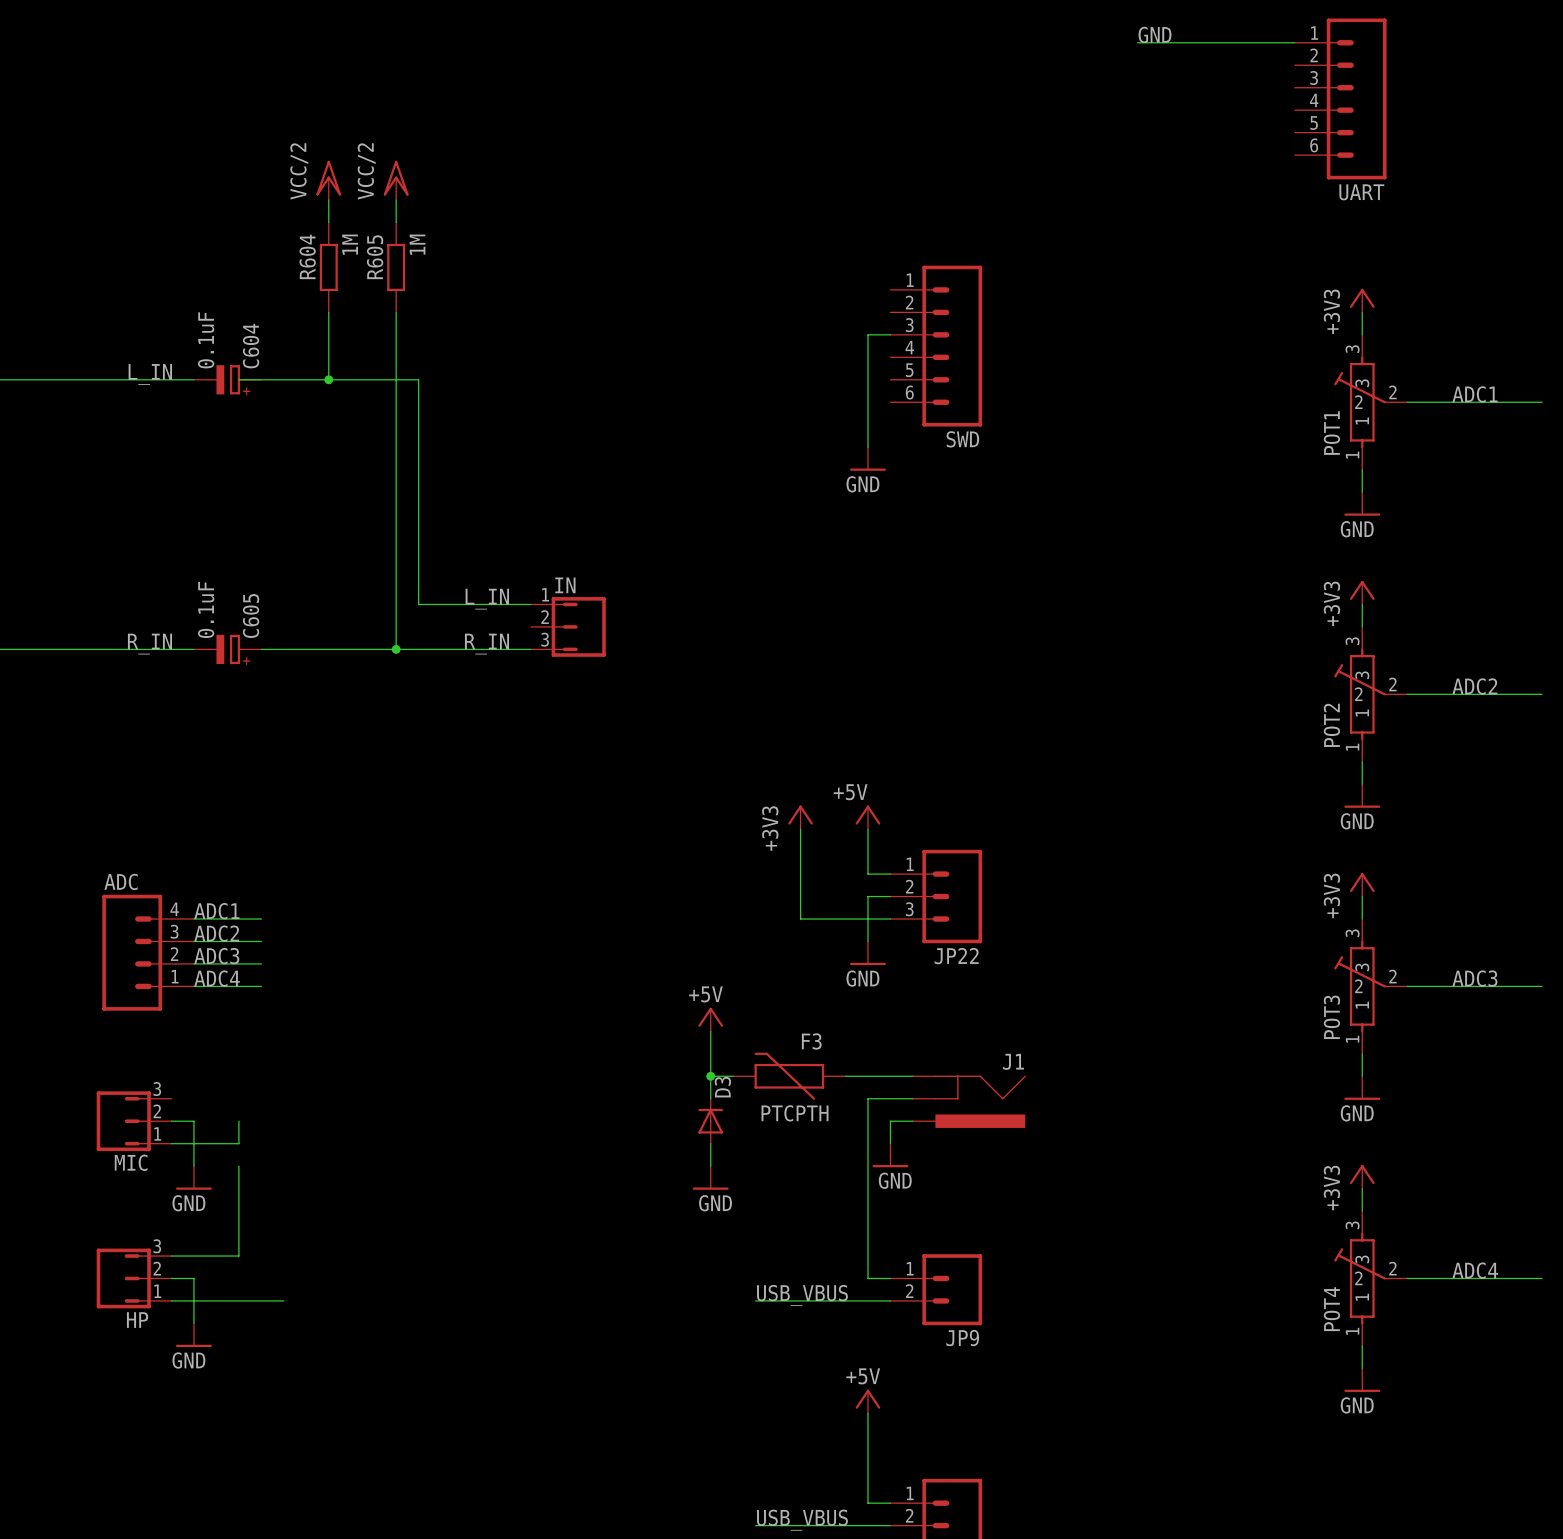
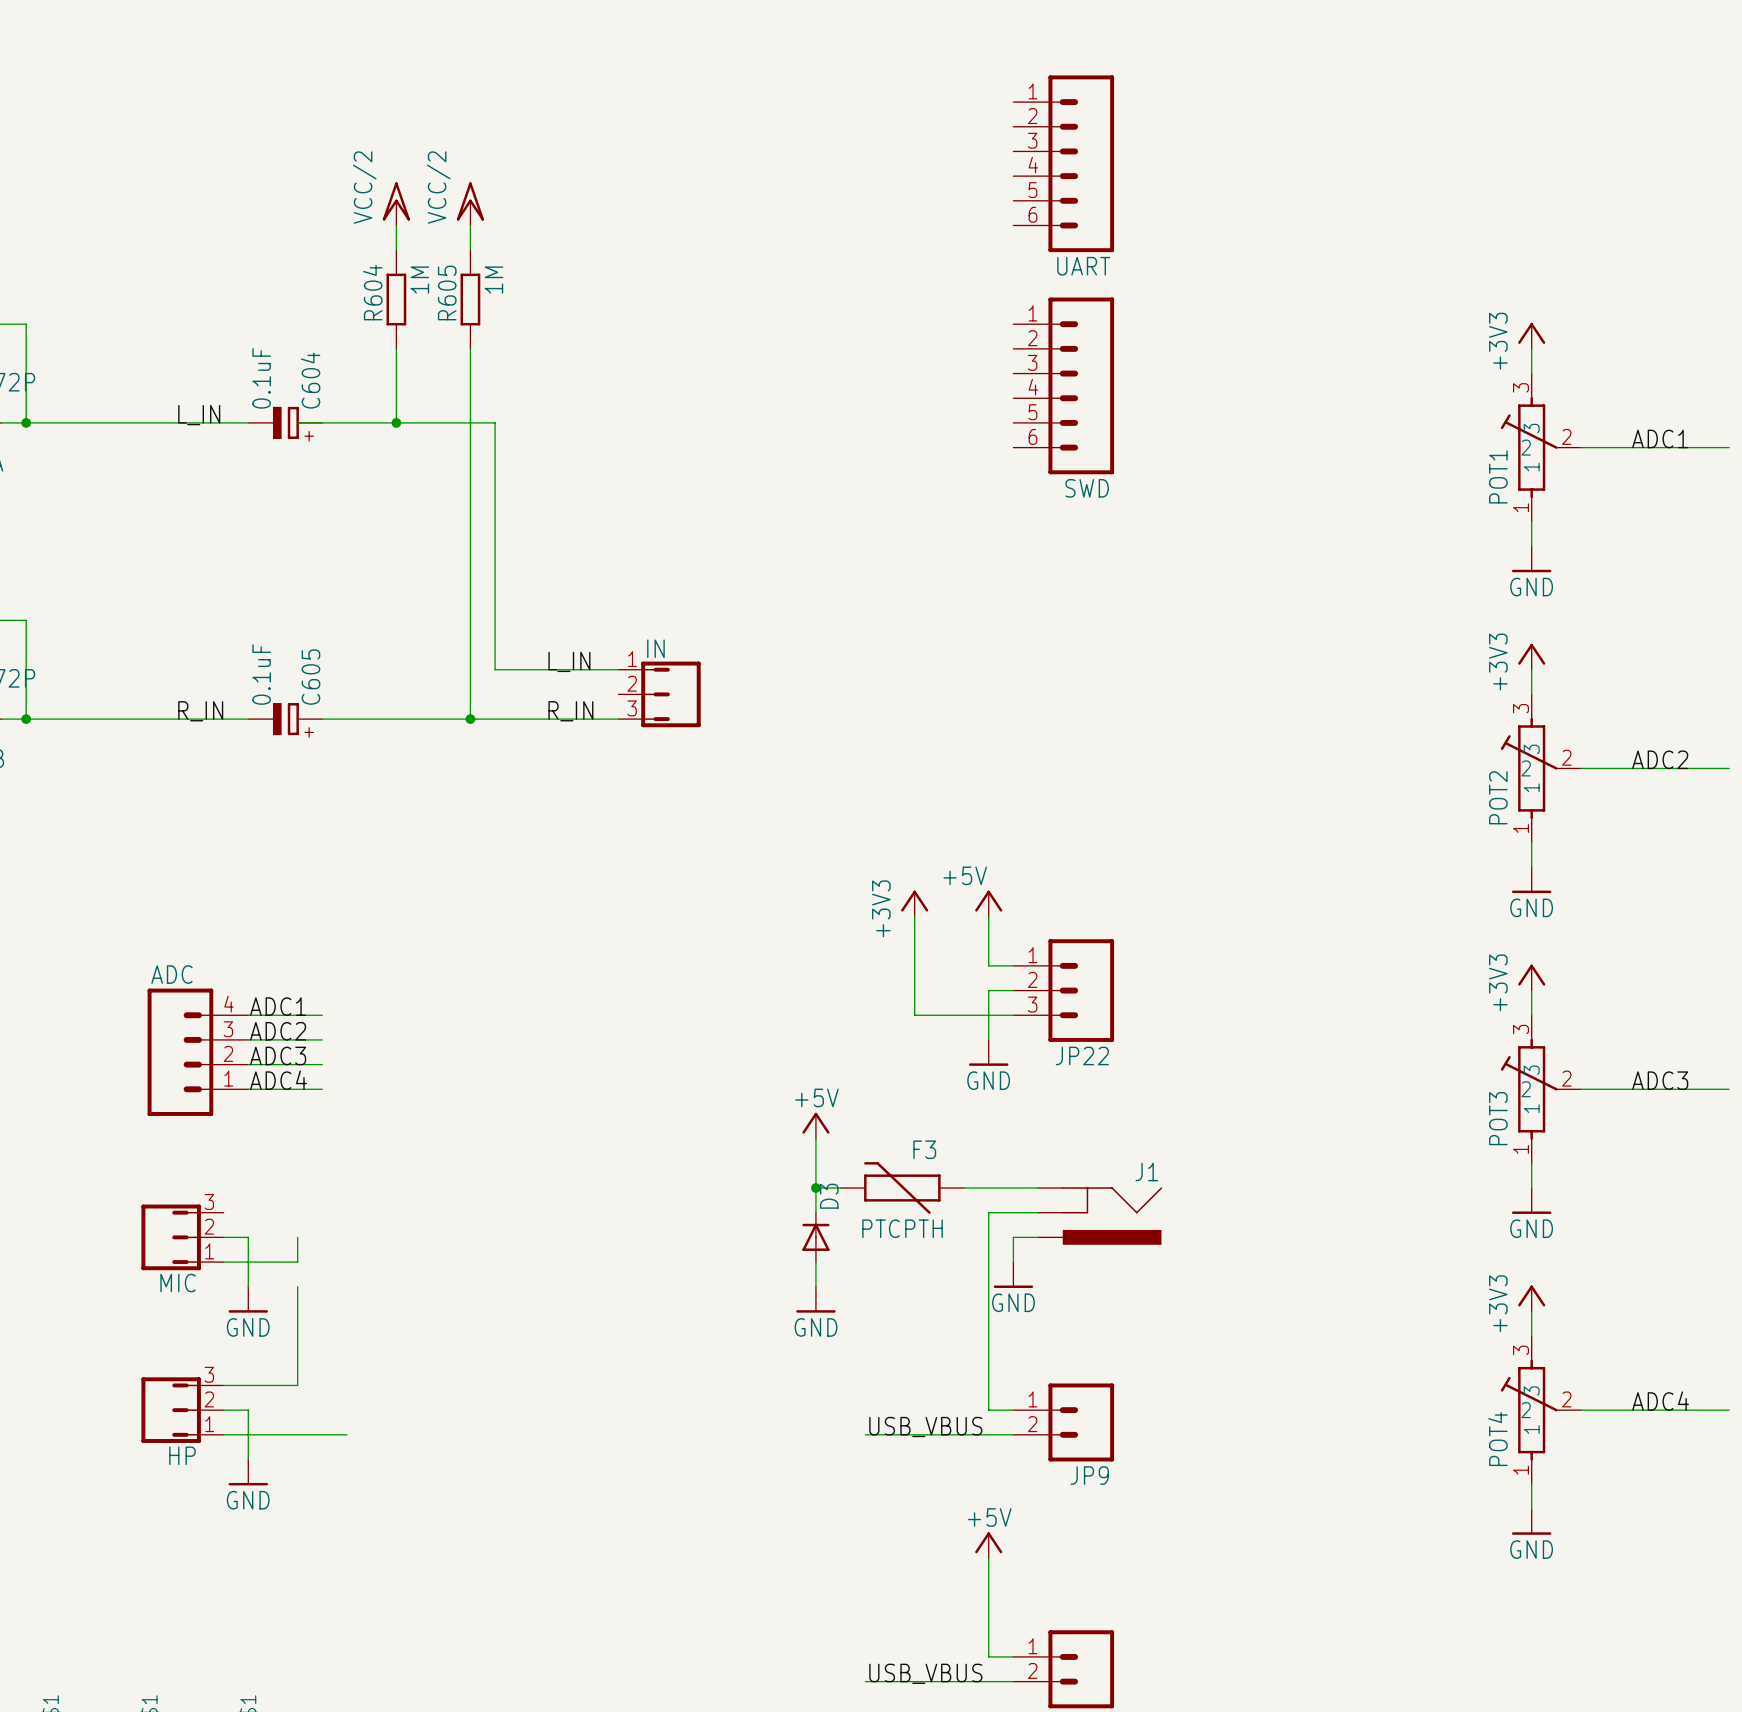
label: GND (1155, 34) -> none
wire: (1137, 42) (1294, 42) -> none
UART: (1340, 98) -> none
UART: none -> (1063, 163)
wire: (890, 334) (867, 334) (867, 447) -> none
power symbol: GND (867, 458) -> none

